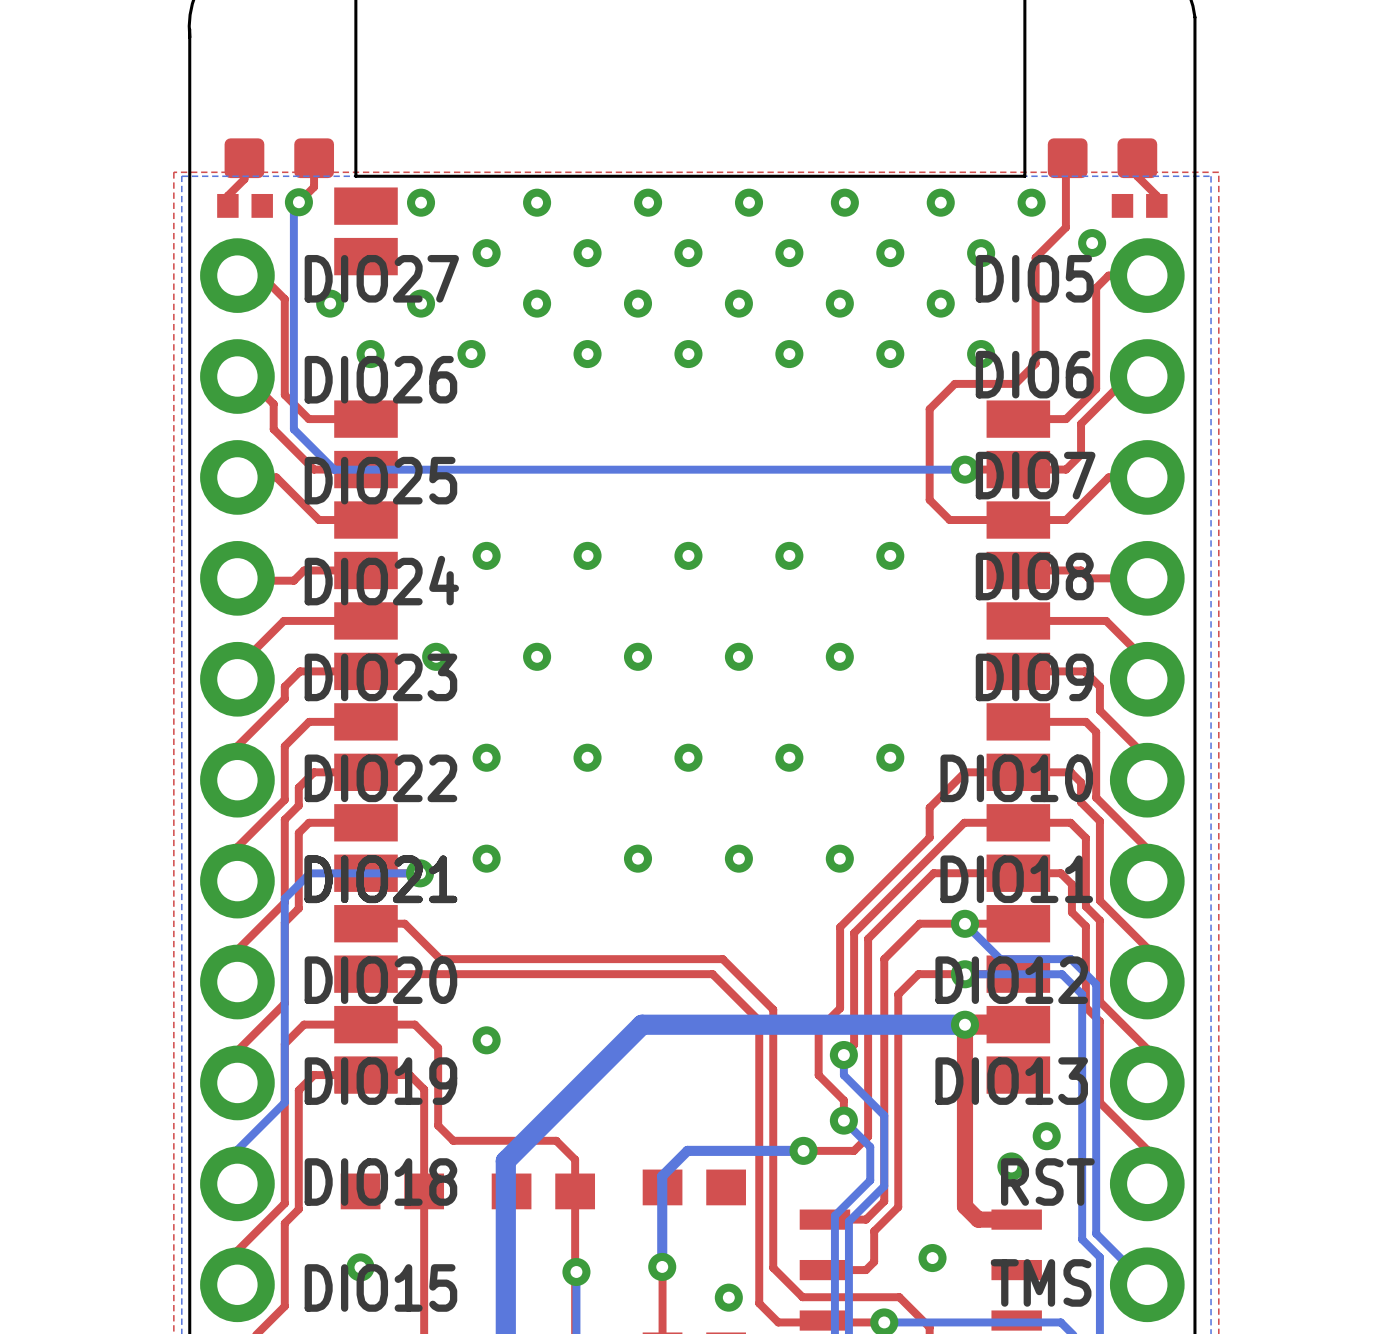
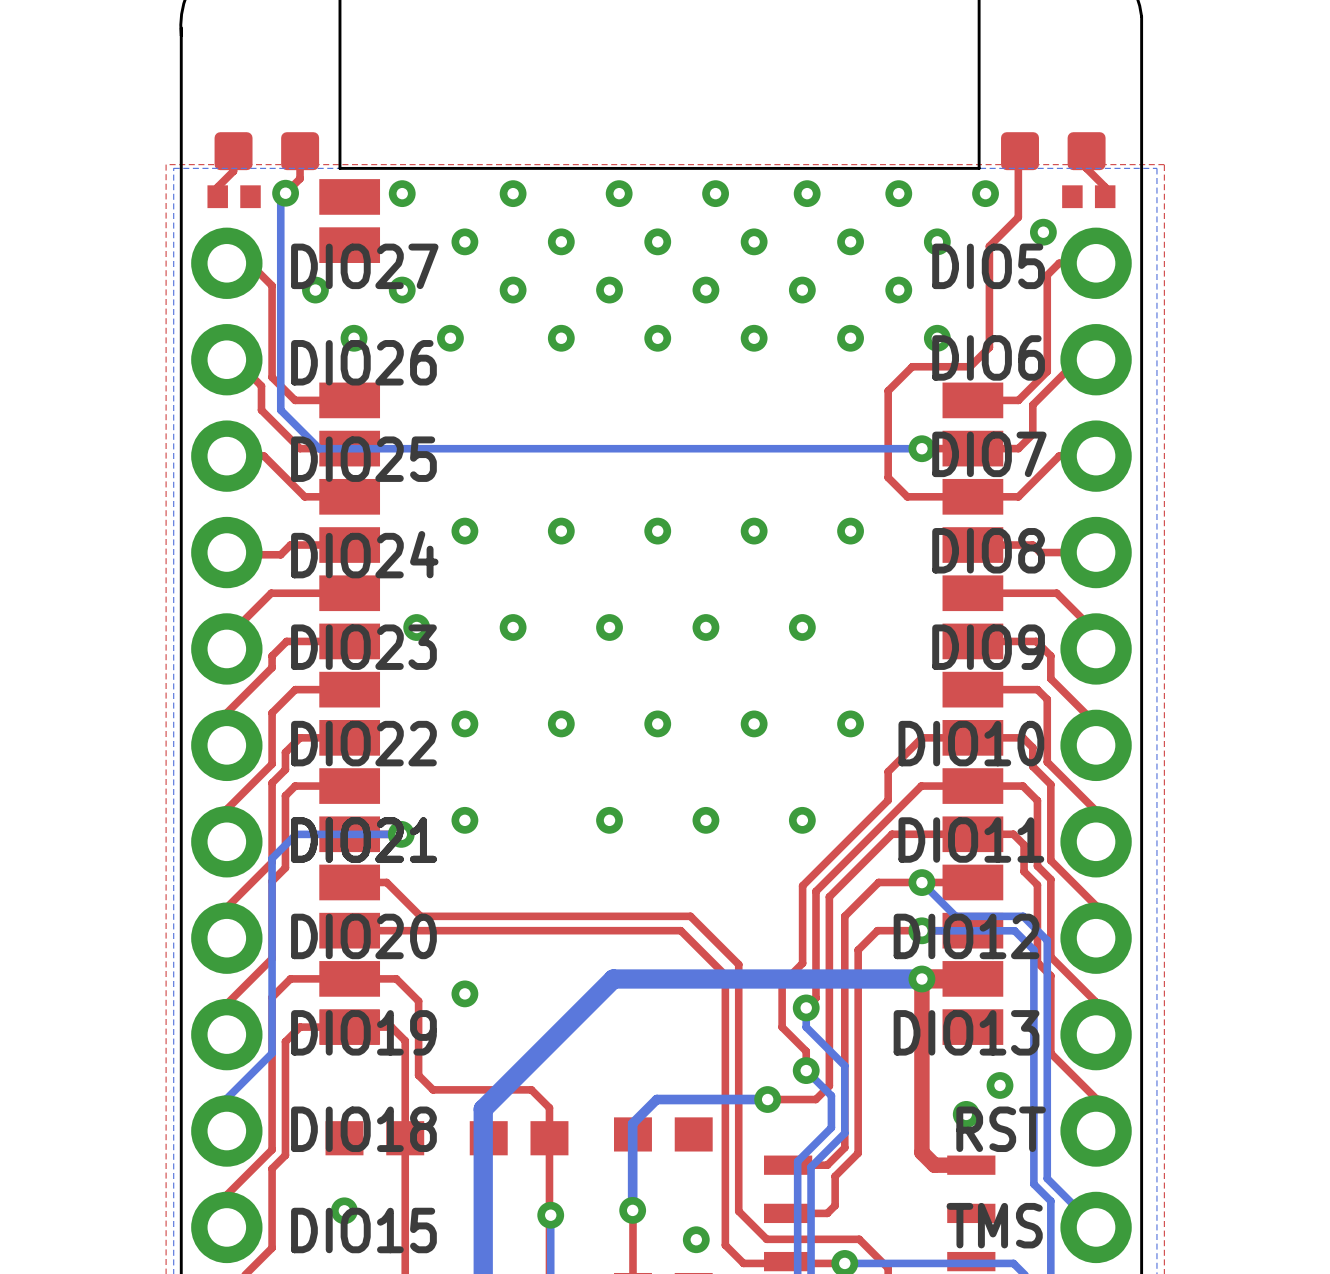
via: (932, 1258) -> none

